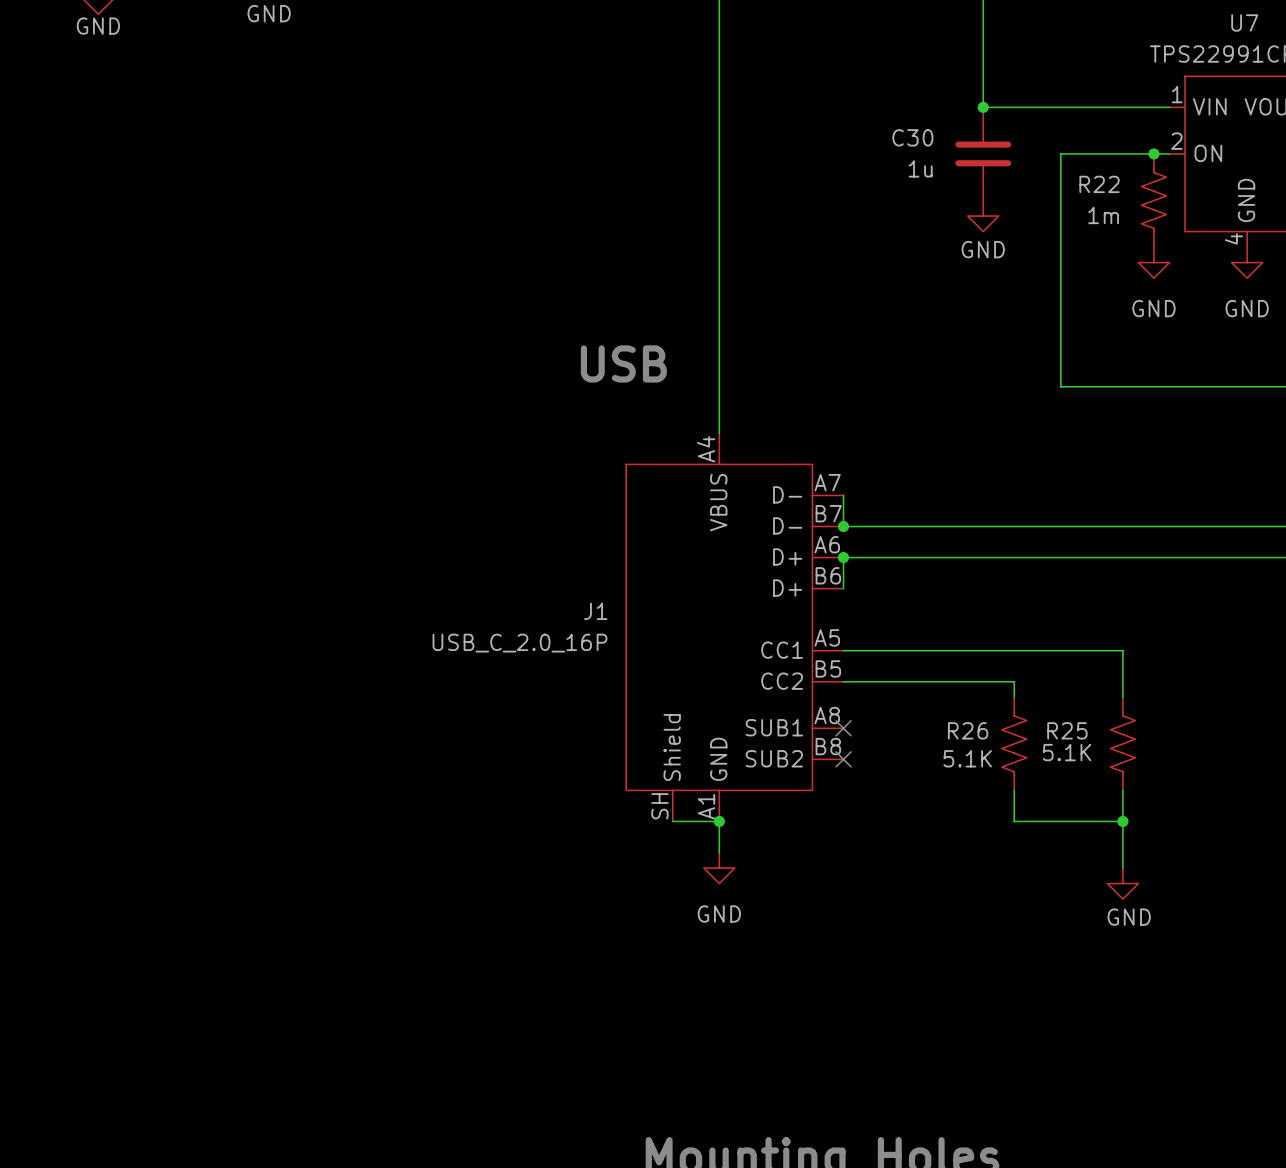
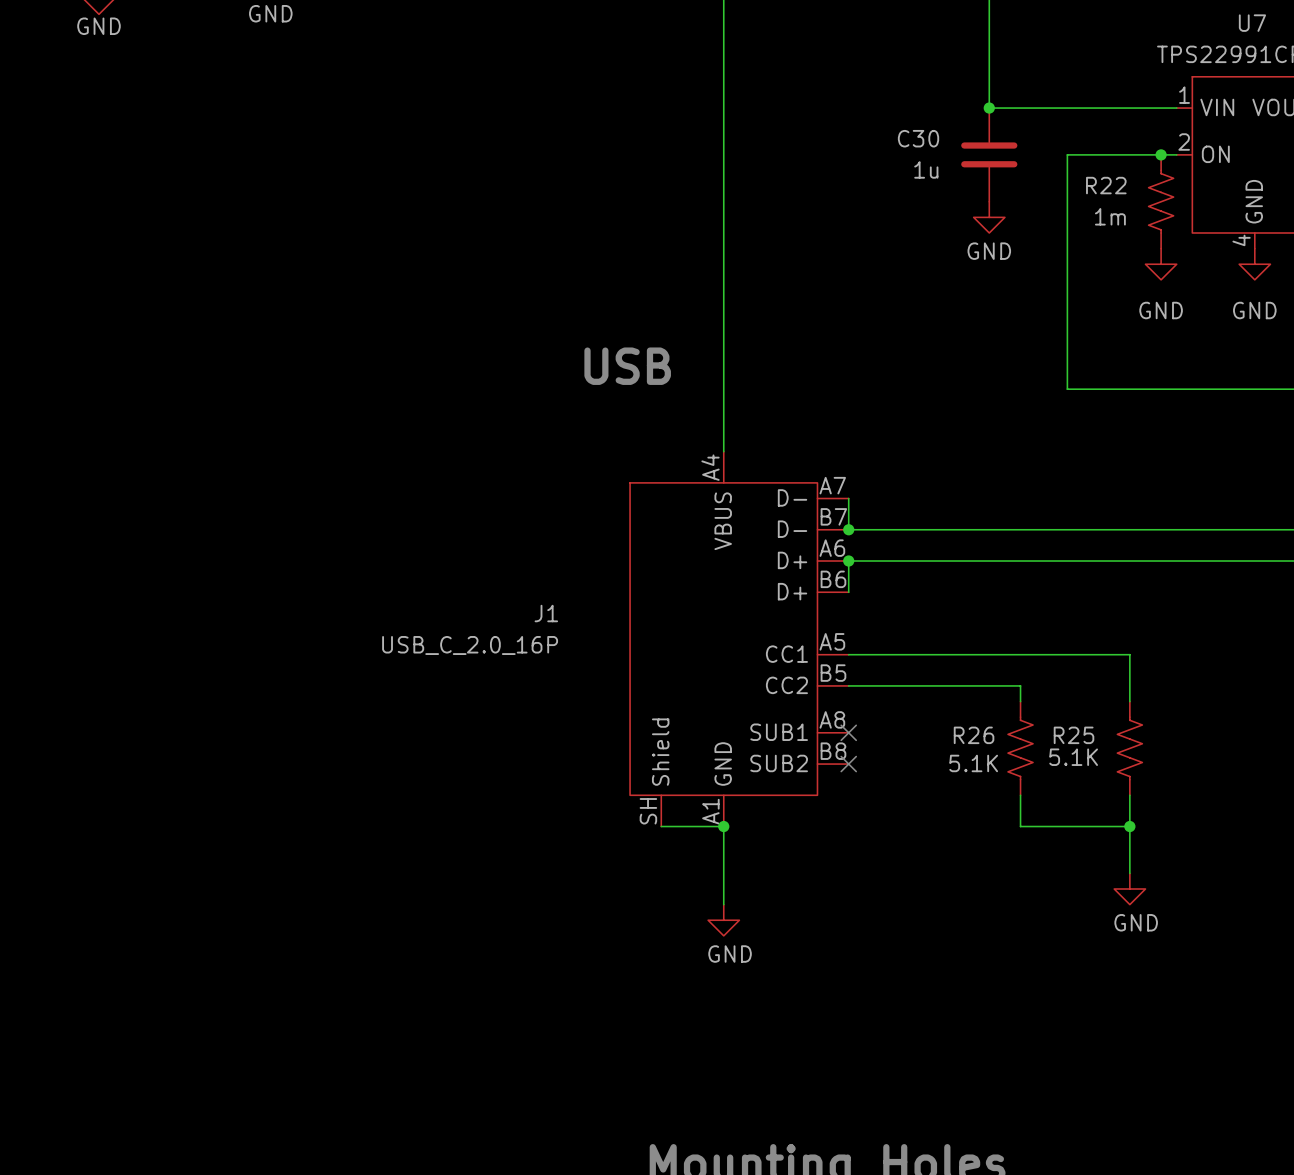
J1 symbol: [626, 433, 844, 822] -> [630, 451, 849, 827]
J1 name position: J1 (595, 611) -> J1 (546, 613)
J1 value position: USB_C_2.0_16P (519, 643) -> USB_C_2.0_16P (470, 645)
wire: none -> (661, 826) (676, 826)
wire: none -> (723, 857) (723, 904)
power symbol position: GND (719, 868) -> GND (723, 920)
power symbol text position: GND (719, 914) -> GND (730, 954)

